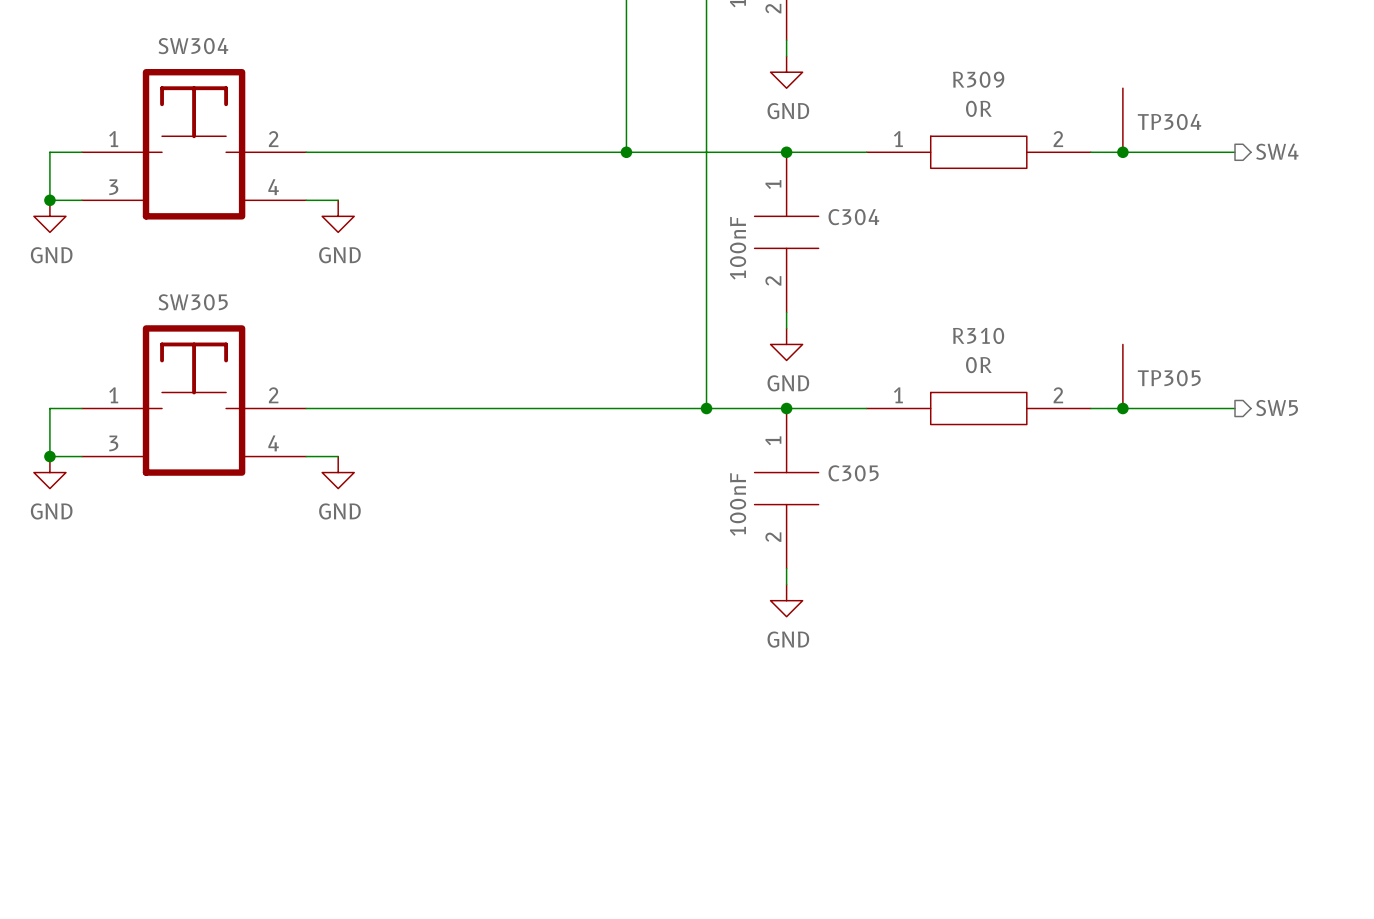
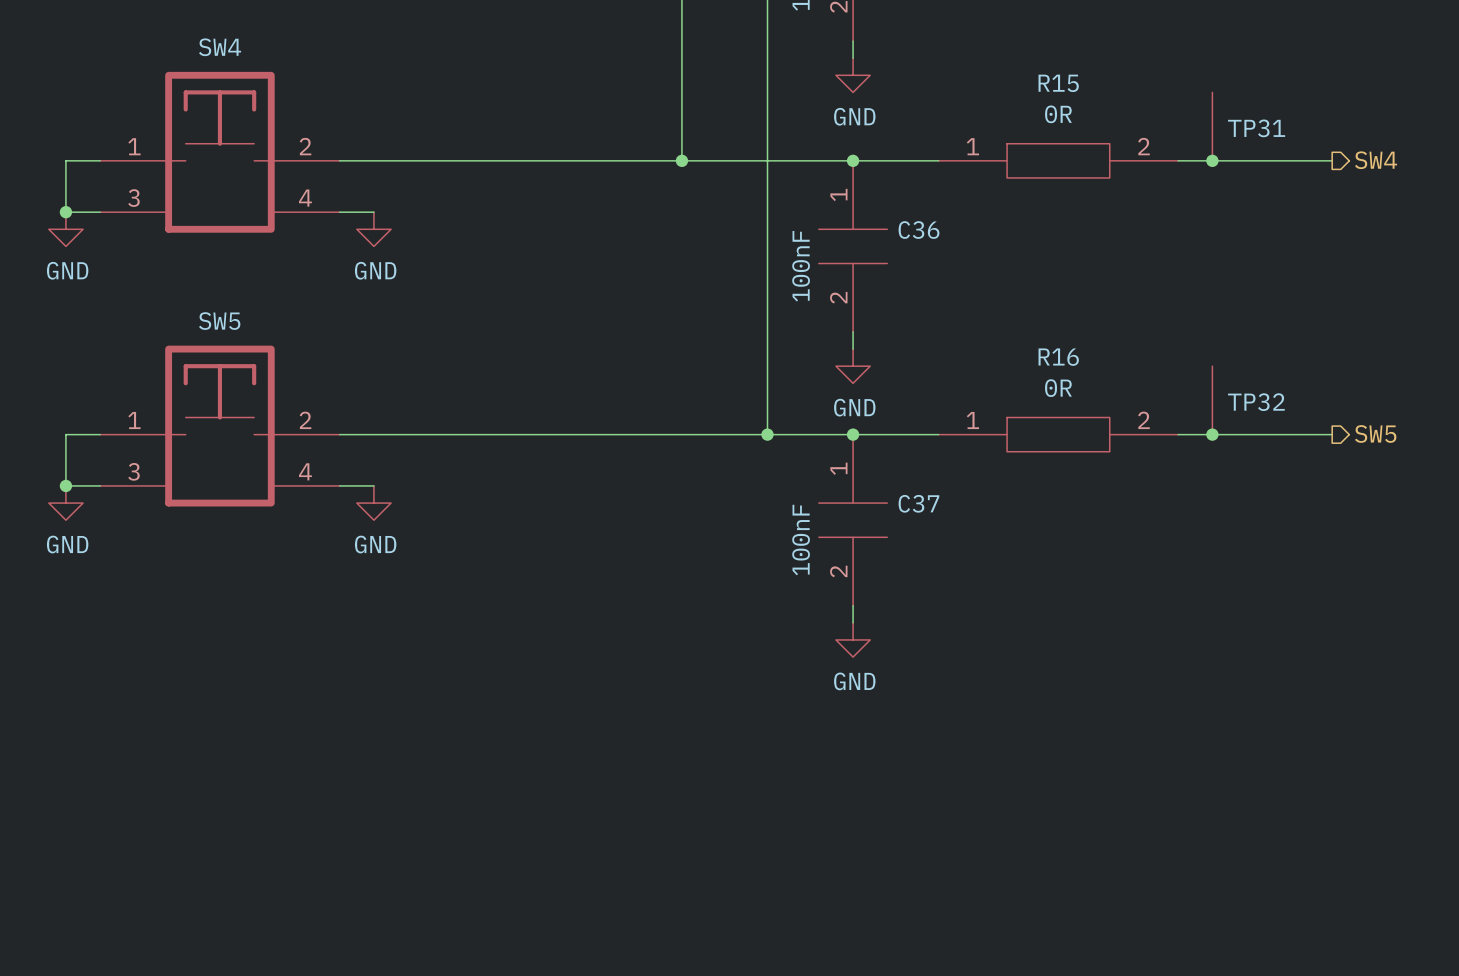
SW304 name: SW304 (193, 46) -> SW4 (220, 47)
R309 name: R309 (978, 79) -> R15 (1058, 83)
TP304 name: TP304 (1169, 121) -> TP31 (1256, 128)
C304 name: C304 (853, 217) -> C36 (919, 230)
SW305 name: SW305 (193, 302) -> SW5 (219, 321)
R310 name: R310 (978, 335) -> R16 (1058, 357)
TP305 name: TP305 (1169, 378) -> TP32 (1256, 402)
C305 name: C305 (853, 473) -> C37 (918, 503)

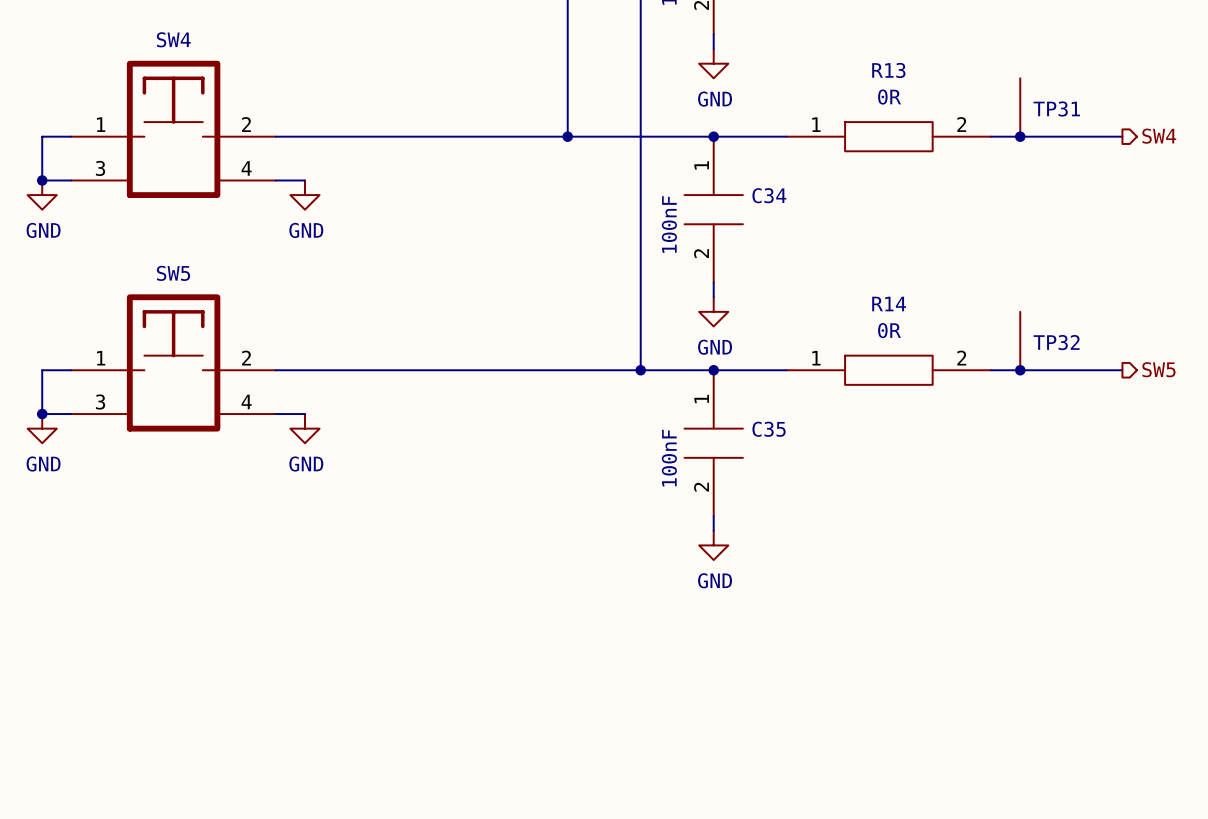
R15 name: R15 (1058, 83) -> R13 (888, 70)
C36 name: C36 (919, 230) -> C34 (769, 195)
R16 name: R16 (1058, 357) -> R14 (889, 304)
C37 name: C37 (918, 503) -> C35 (769, 429)

